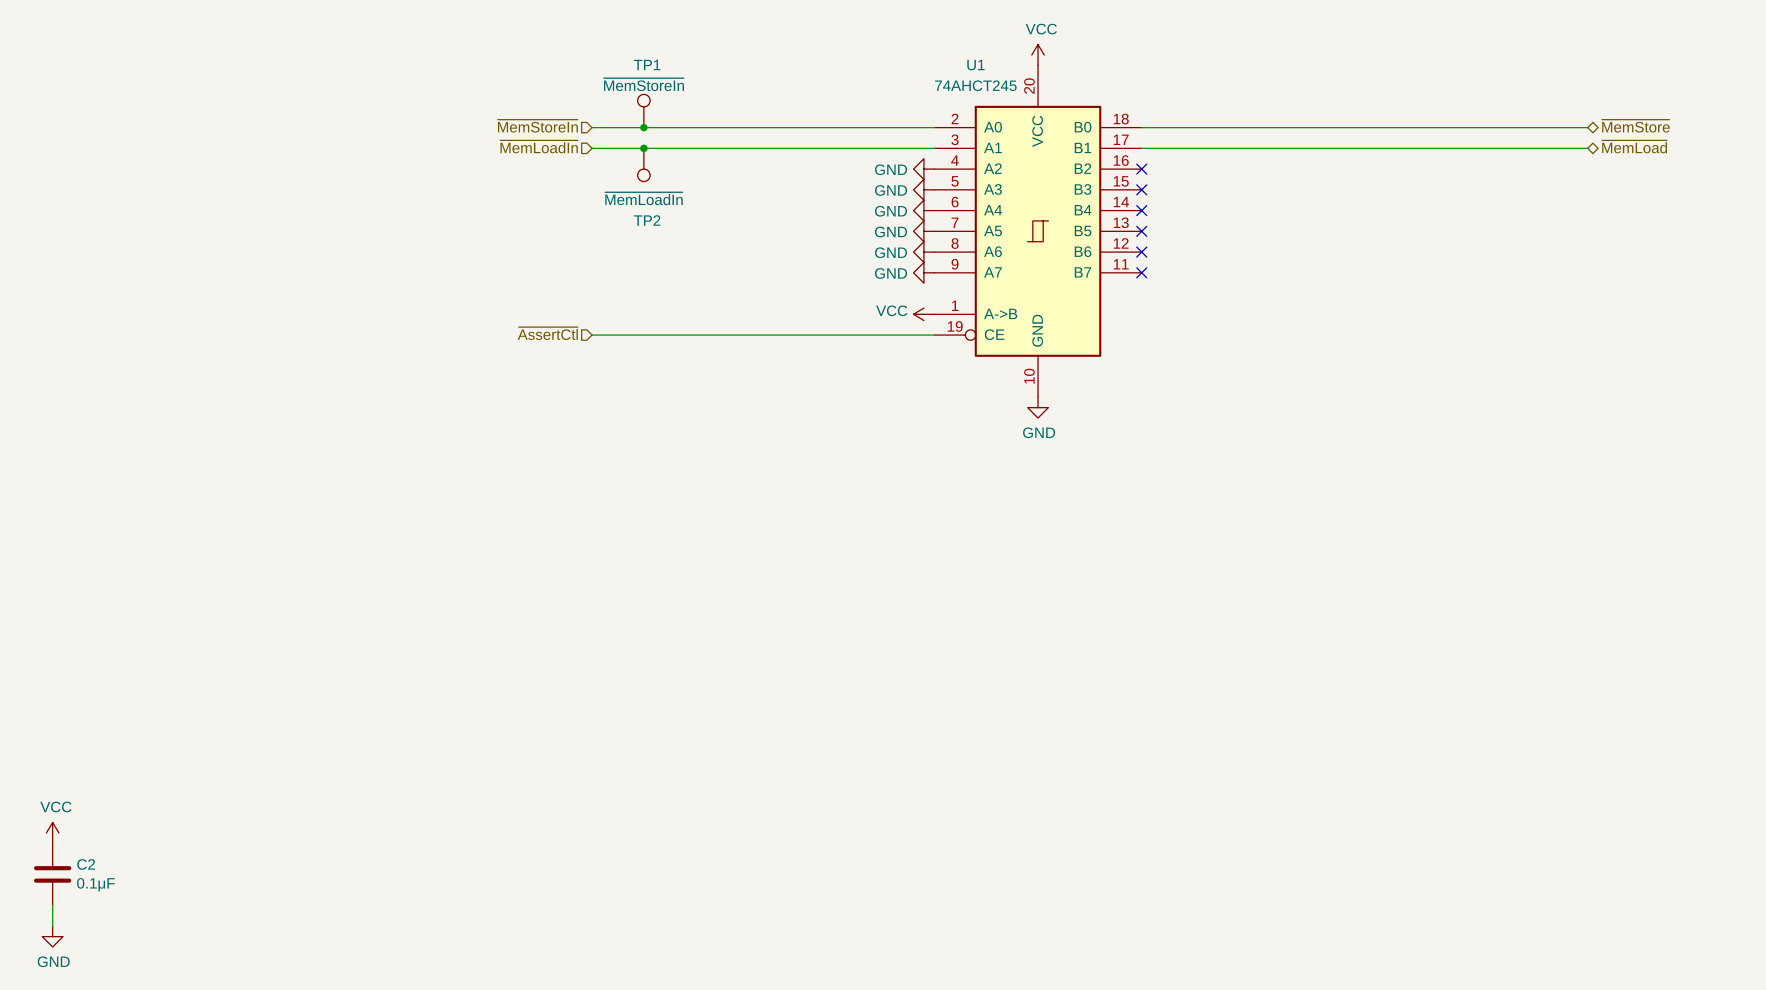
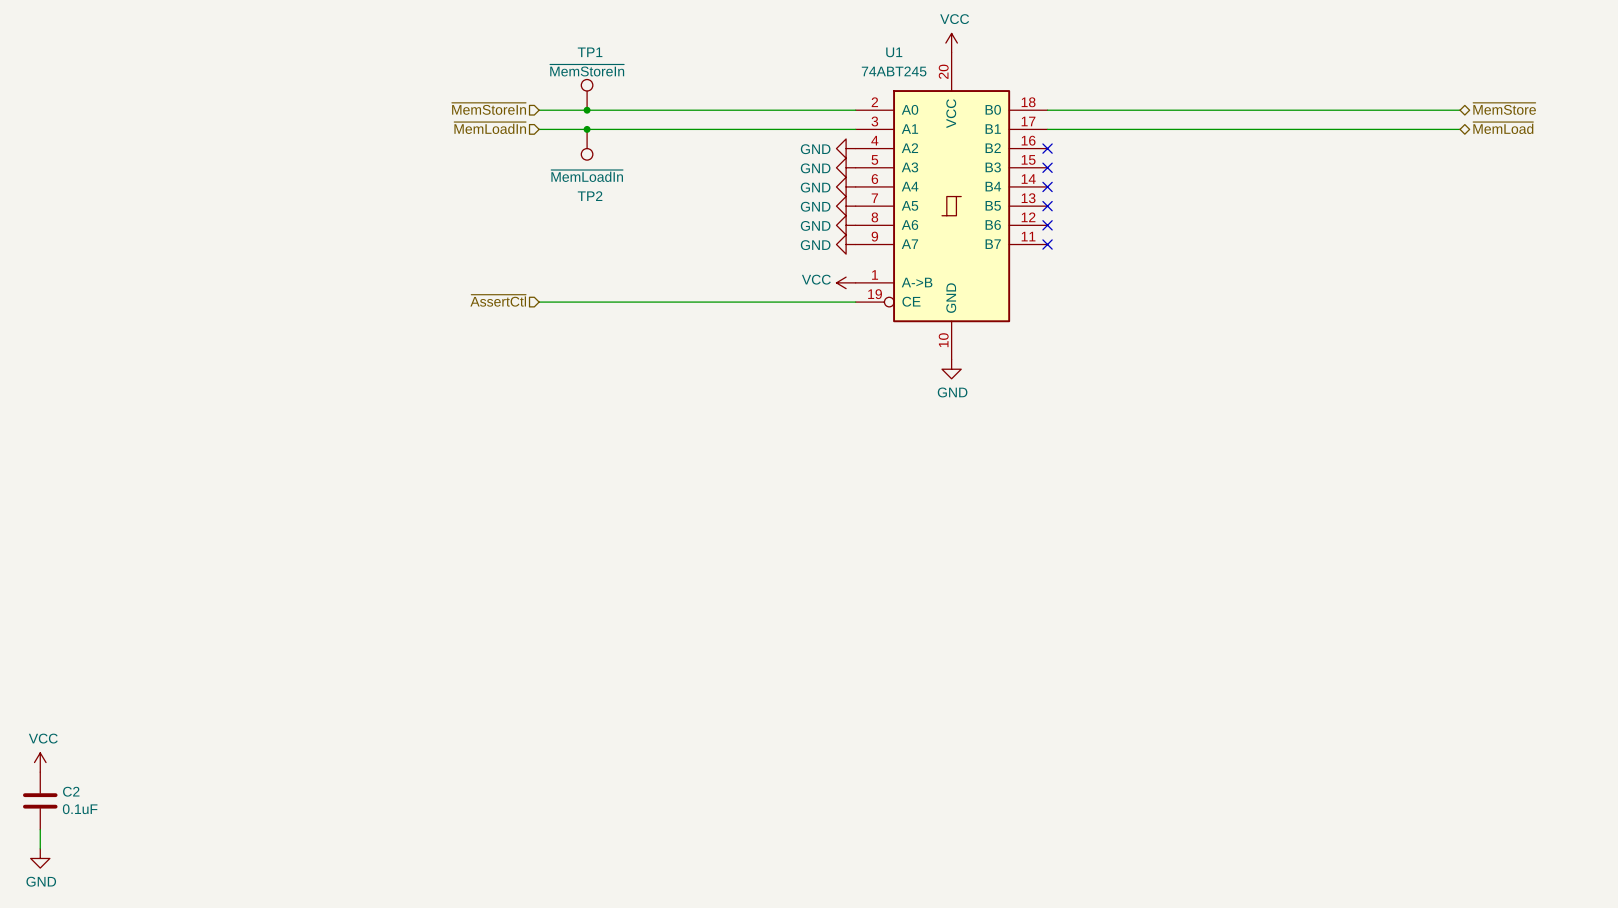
U1 value: 74AHCT245 (975, 85) -> 74ABT245 (894, 71)
C2 value: 0.1μF (95, 884) -> 0.1uF (80, 809)

